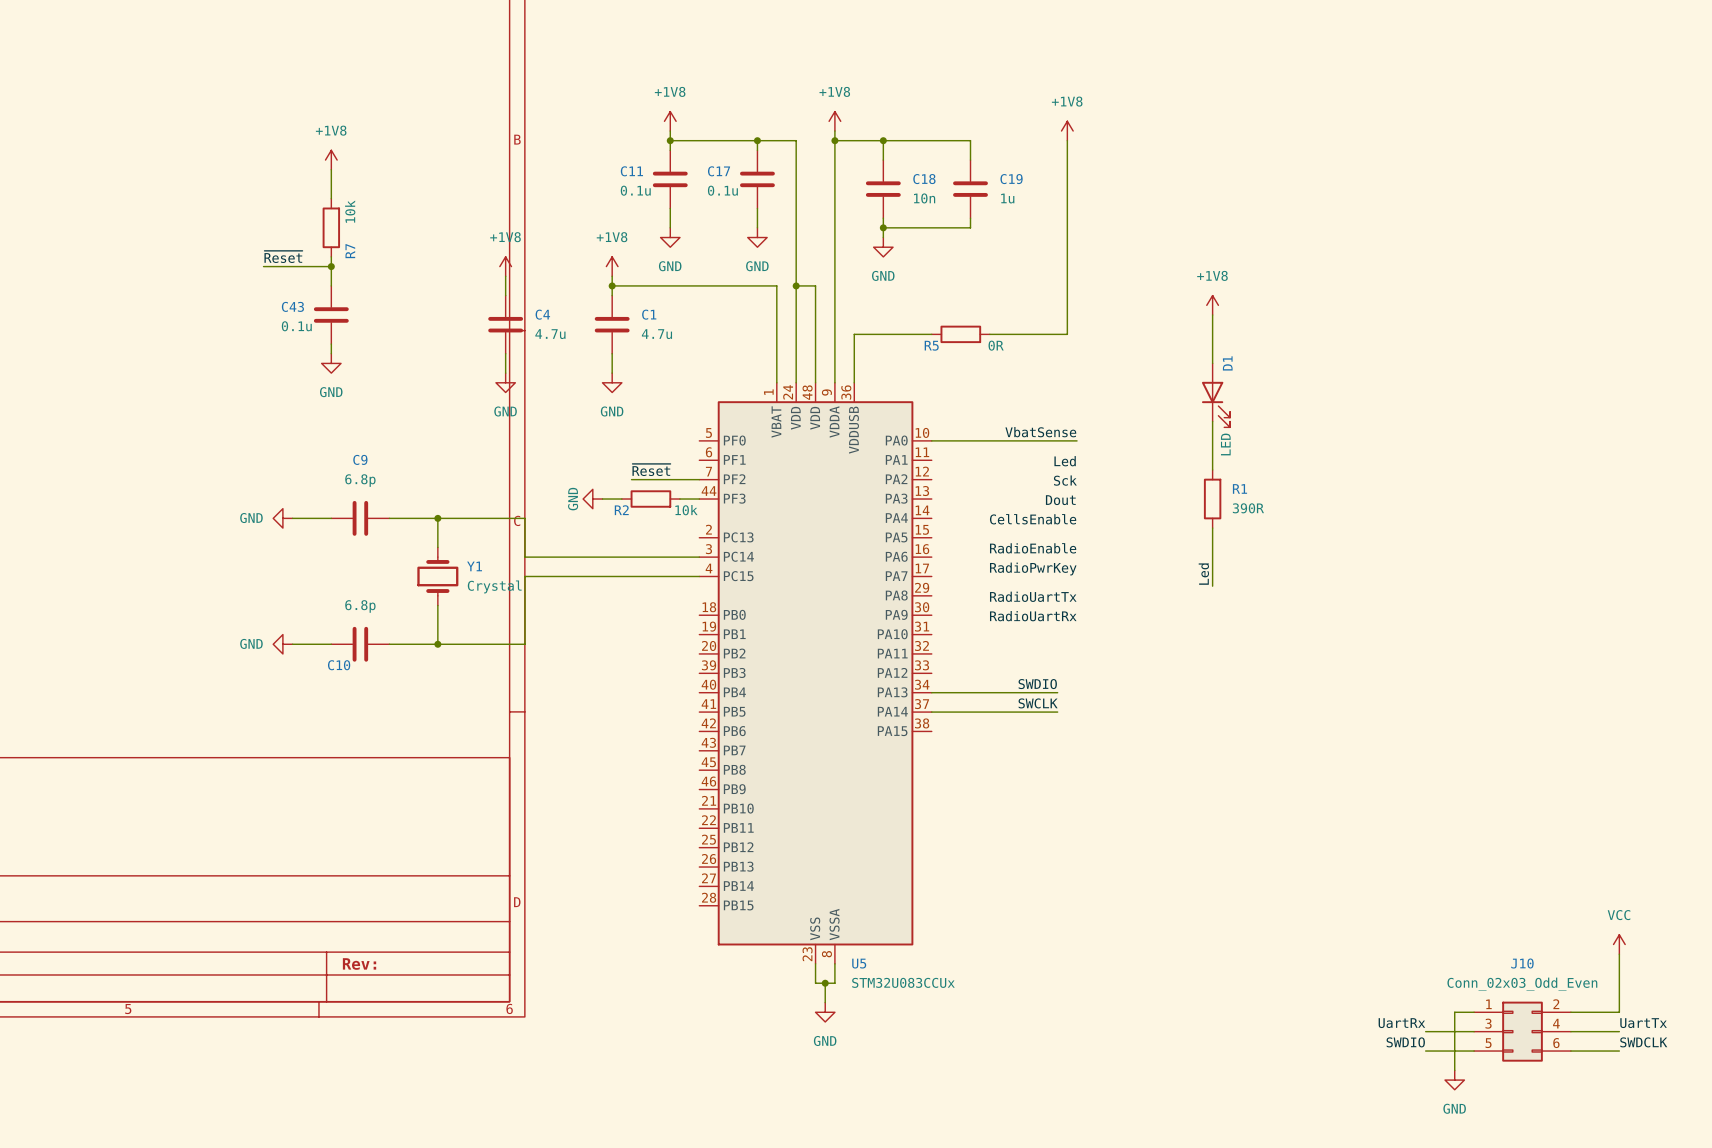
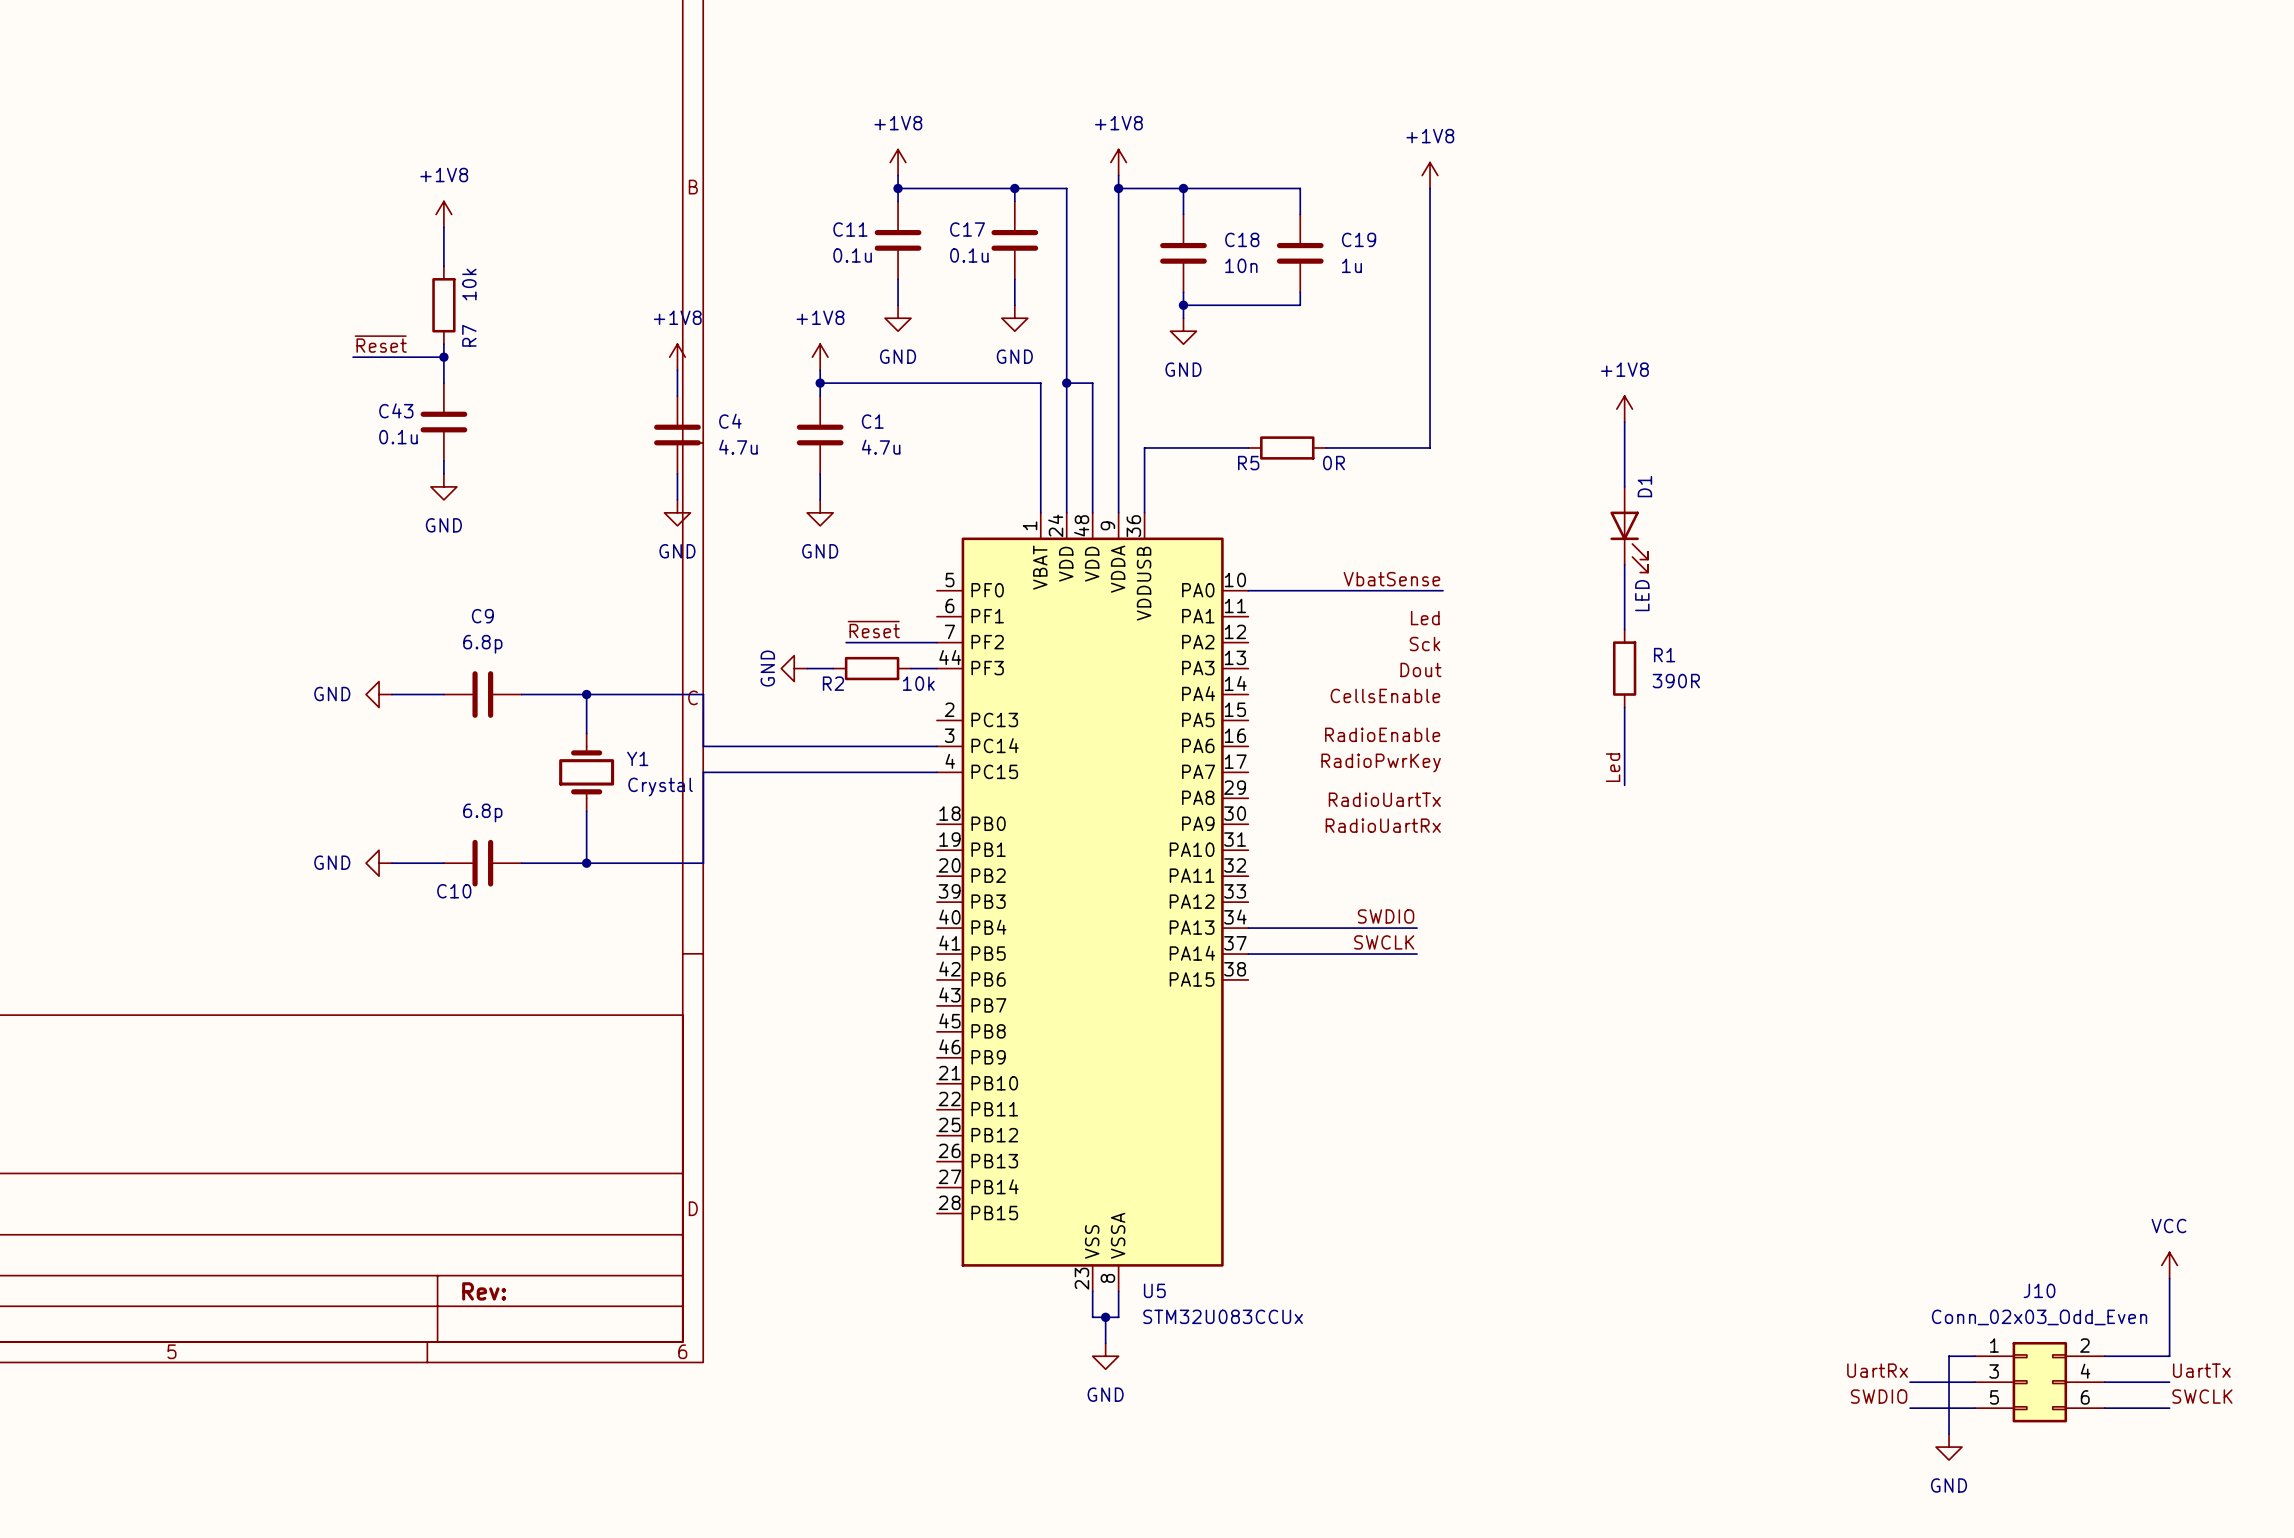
label: SWDCLK (1643, 1042) -> SWCLK (2202, 1396)

